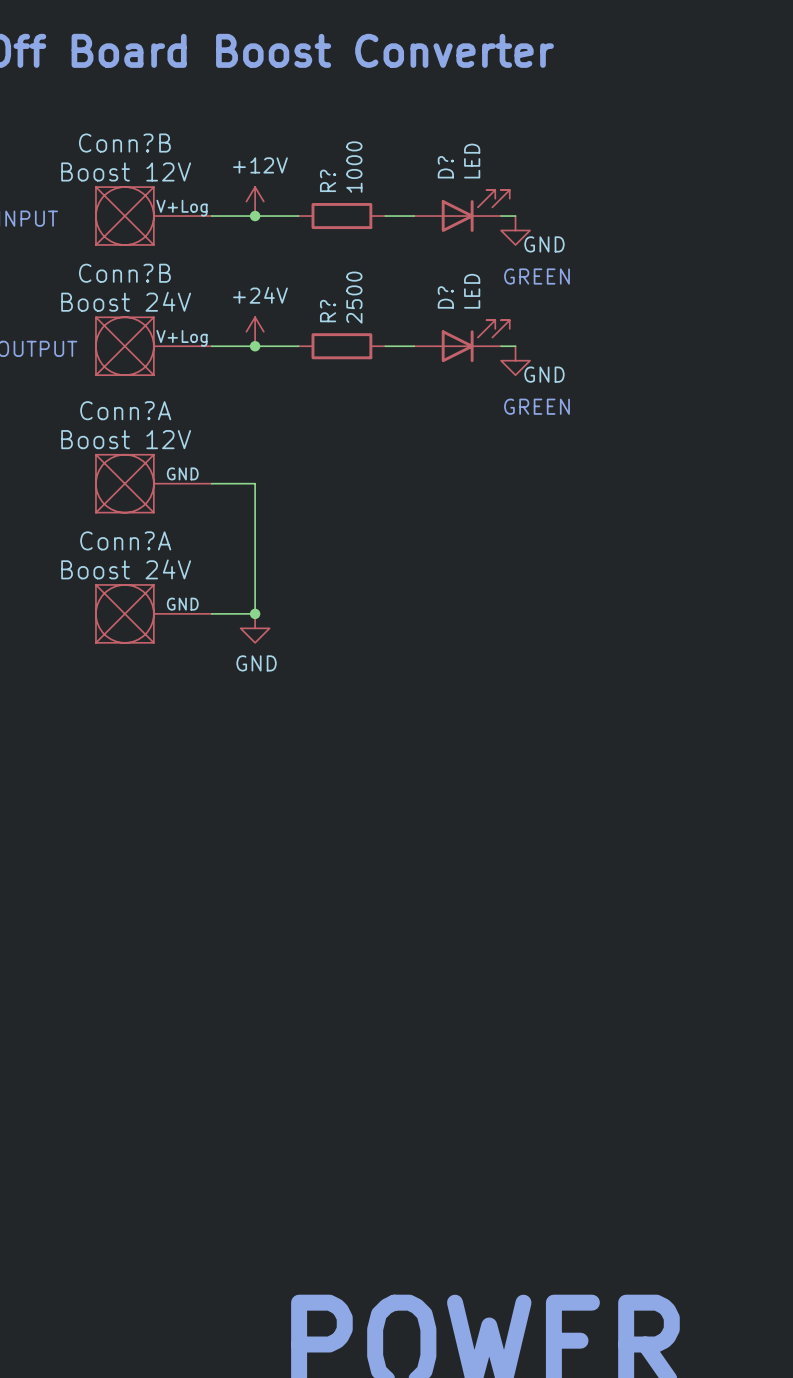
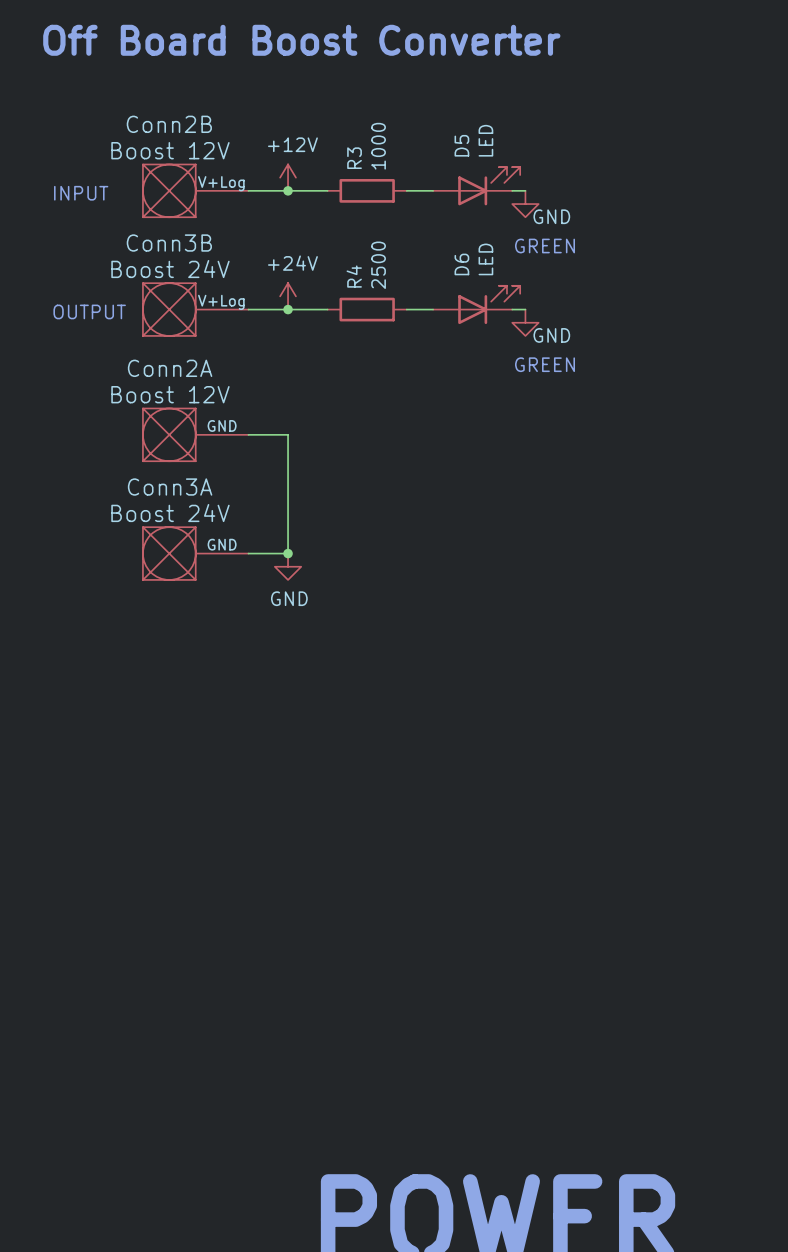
Conn?B name: Conn?B (124, 143) -> Conn2B (169, 124)
D? name: D? (445, 167) -> D5 (461, 145)
R? name: R? (328, 180) -> R3 (354, 158)
Conn?B name: Conn?B (124, 273) -> Conn3B (169, 243)
D? name: D? (445, 297) -> D6 (461, 264)
R? name: R? (328, 311) -> R4 (354, 276)
Conn?A name: Conn?A (125, 410) -> Conn2A (170, 368)
Conn?A name: Conn?A (125, 540) -> Conn3A (170, 487)

